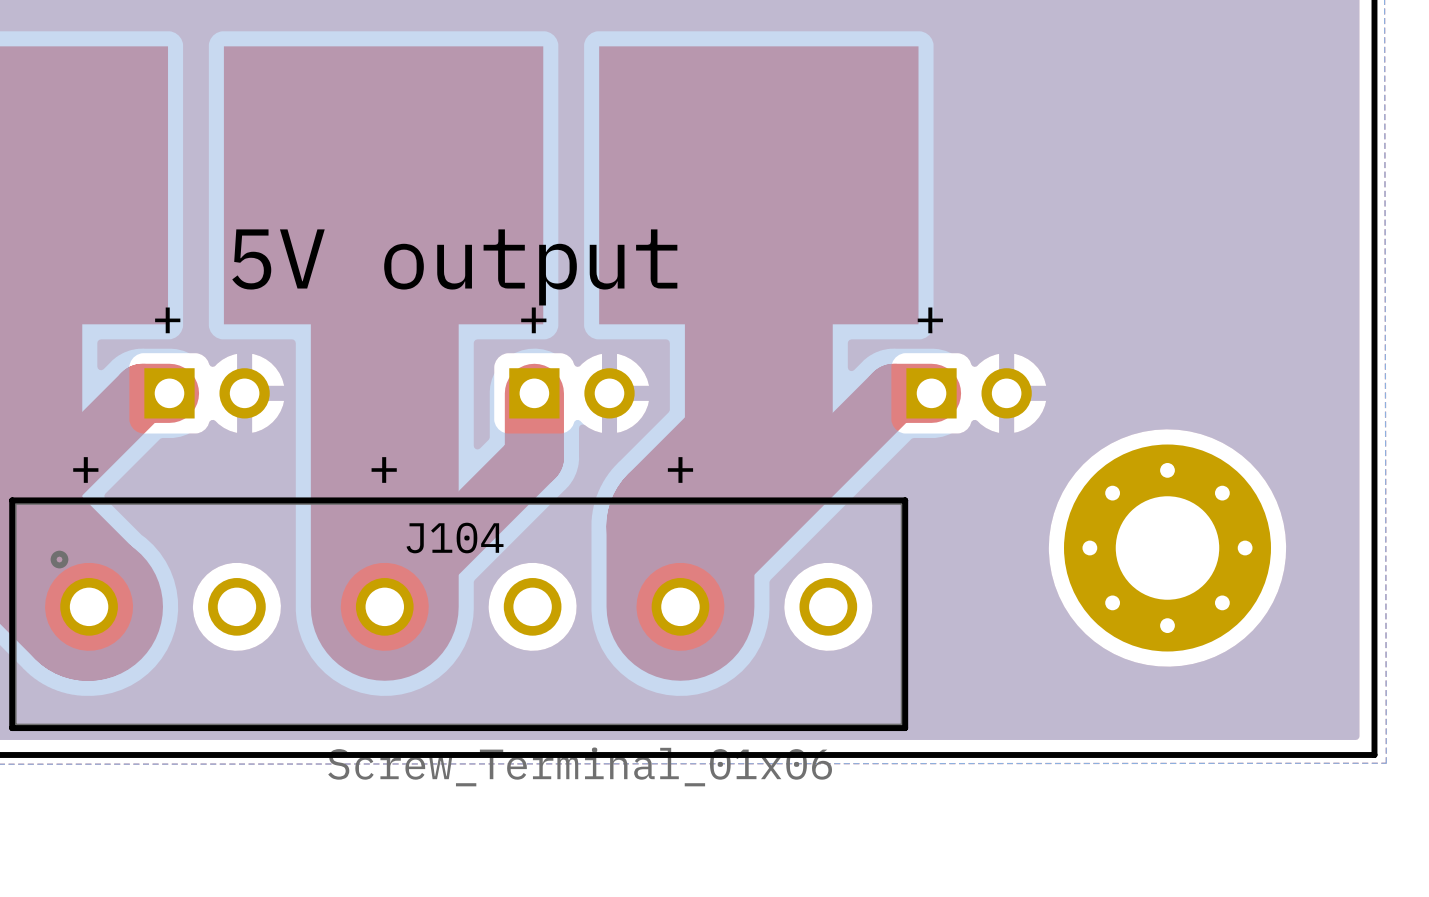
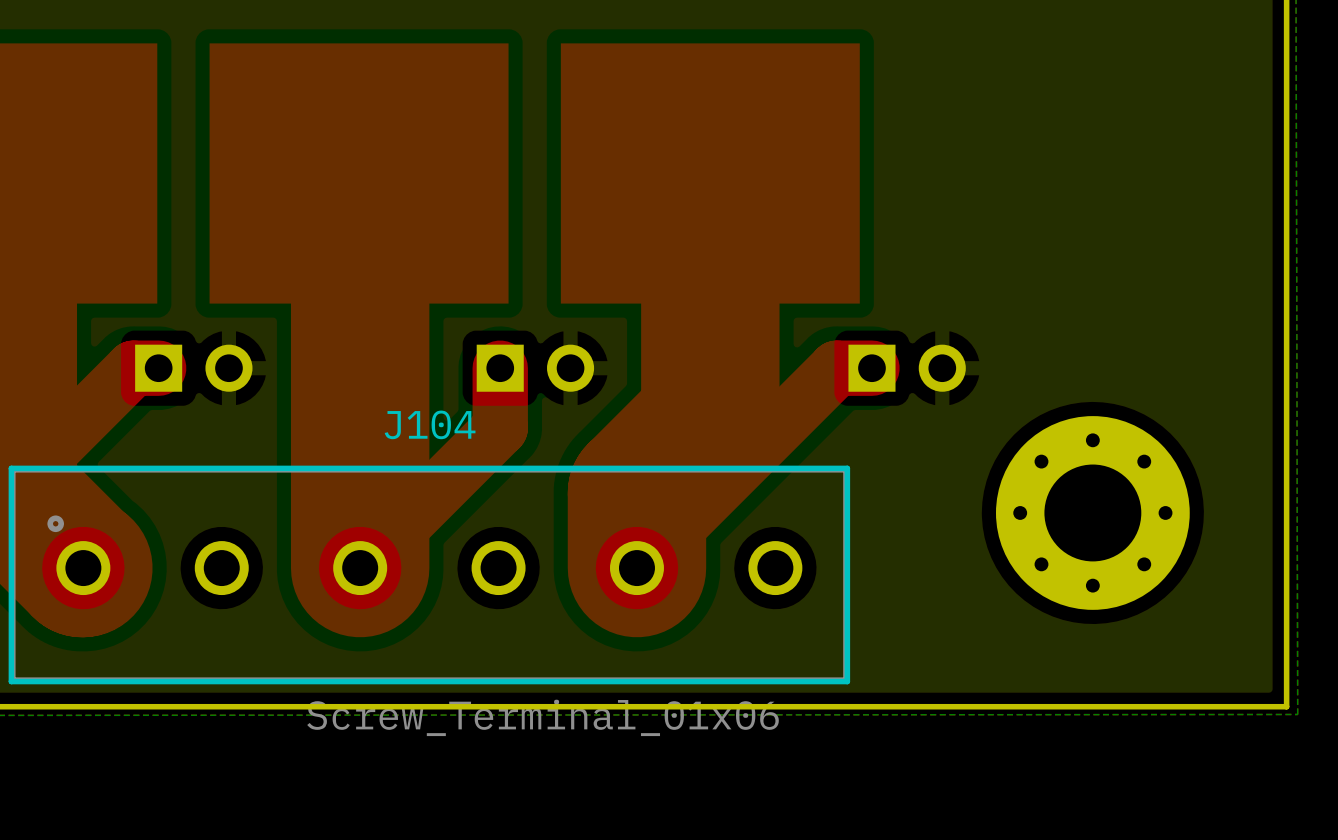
text: 5V output (454, 267) -> none
text: + (167, 320) -> none
text: + (533, 320) -> none
text: + (930, 320) -> none
text: + (85, 470) -> none
text: + (384, 470) -> none
text: + (680, 470) -> none
J104 name position: J104 (455, 538) -> J104 (430, 424)

